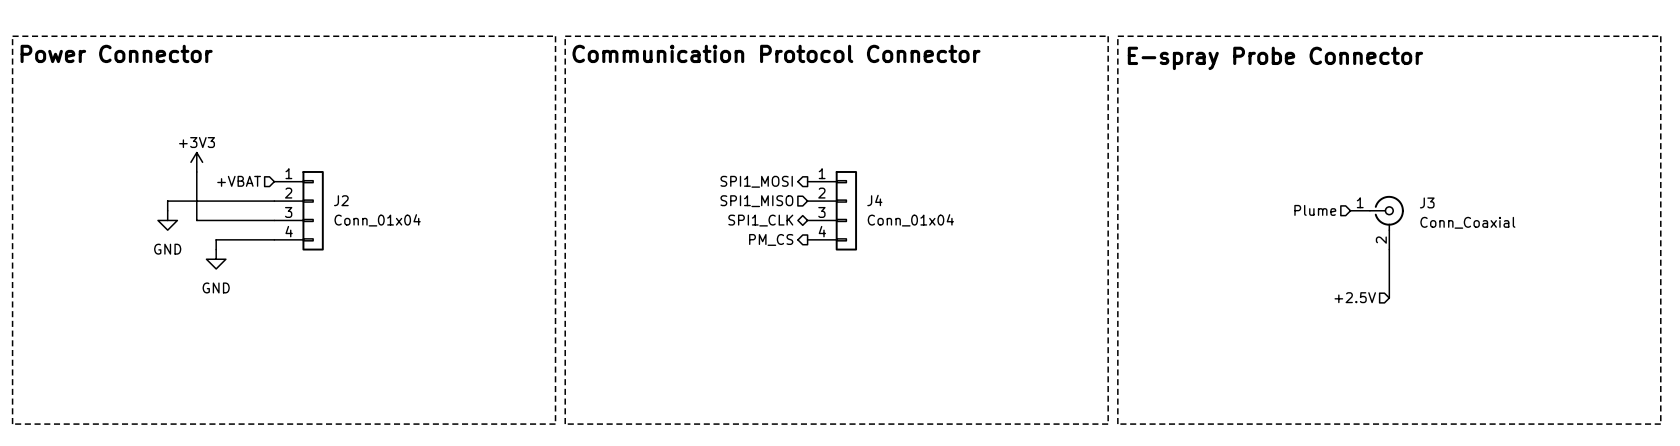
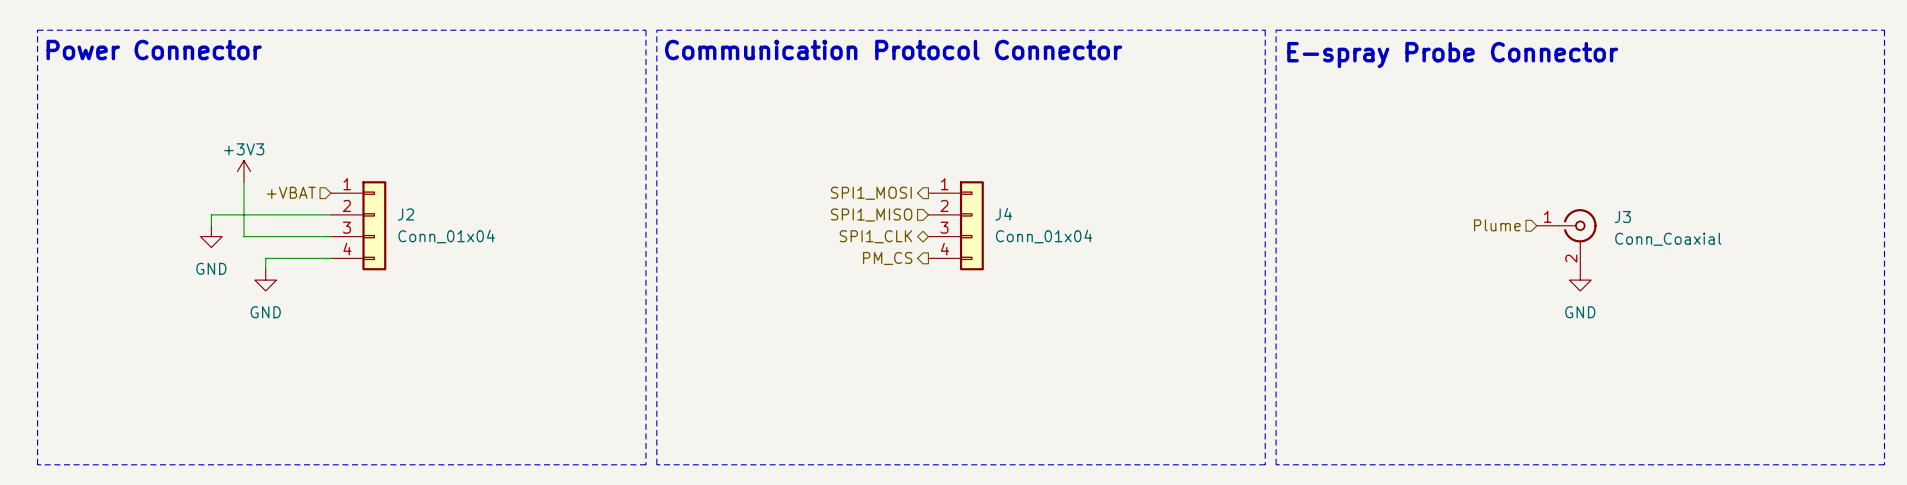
wire: (1389, 249) (1389, 298) -> none
power symbol: none -> GND (1580, 280)
hierarchical label: +2.5V (1355, 297) -> none

